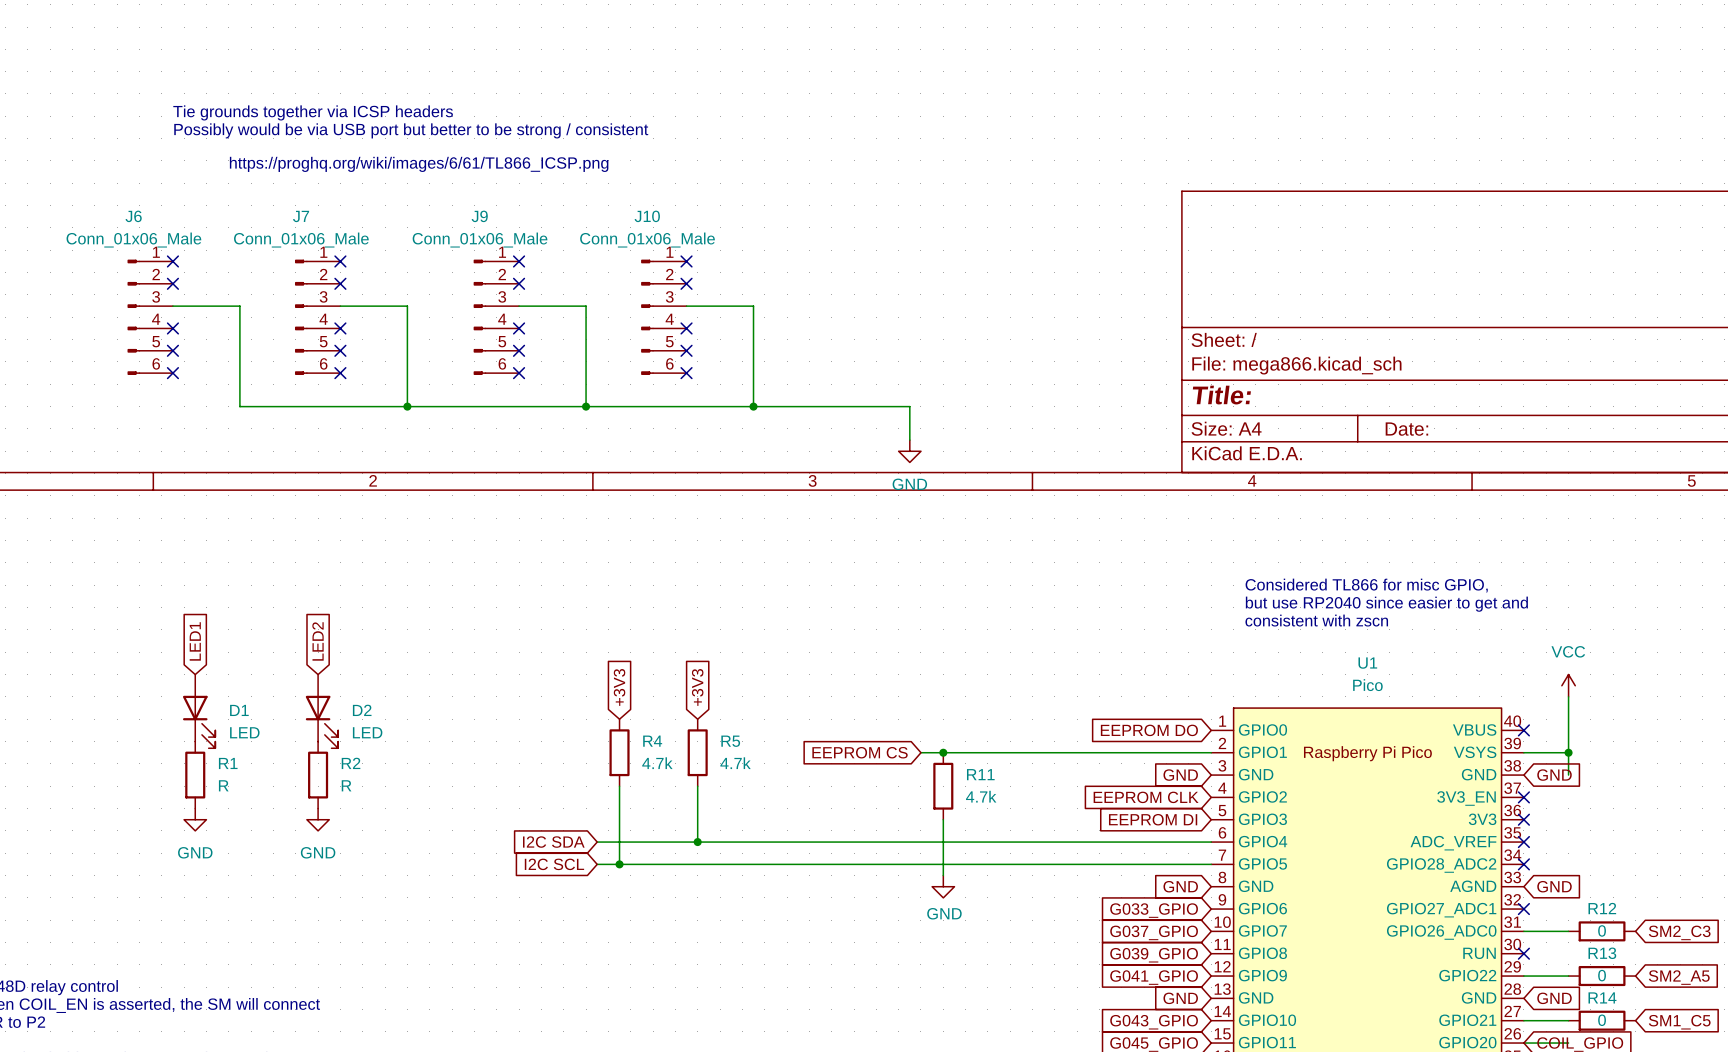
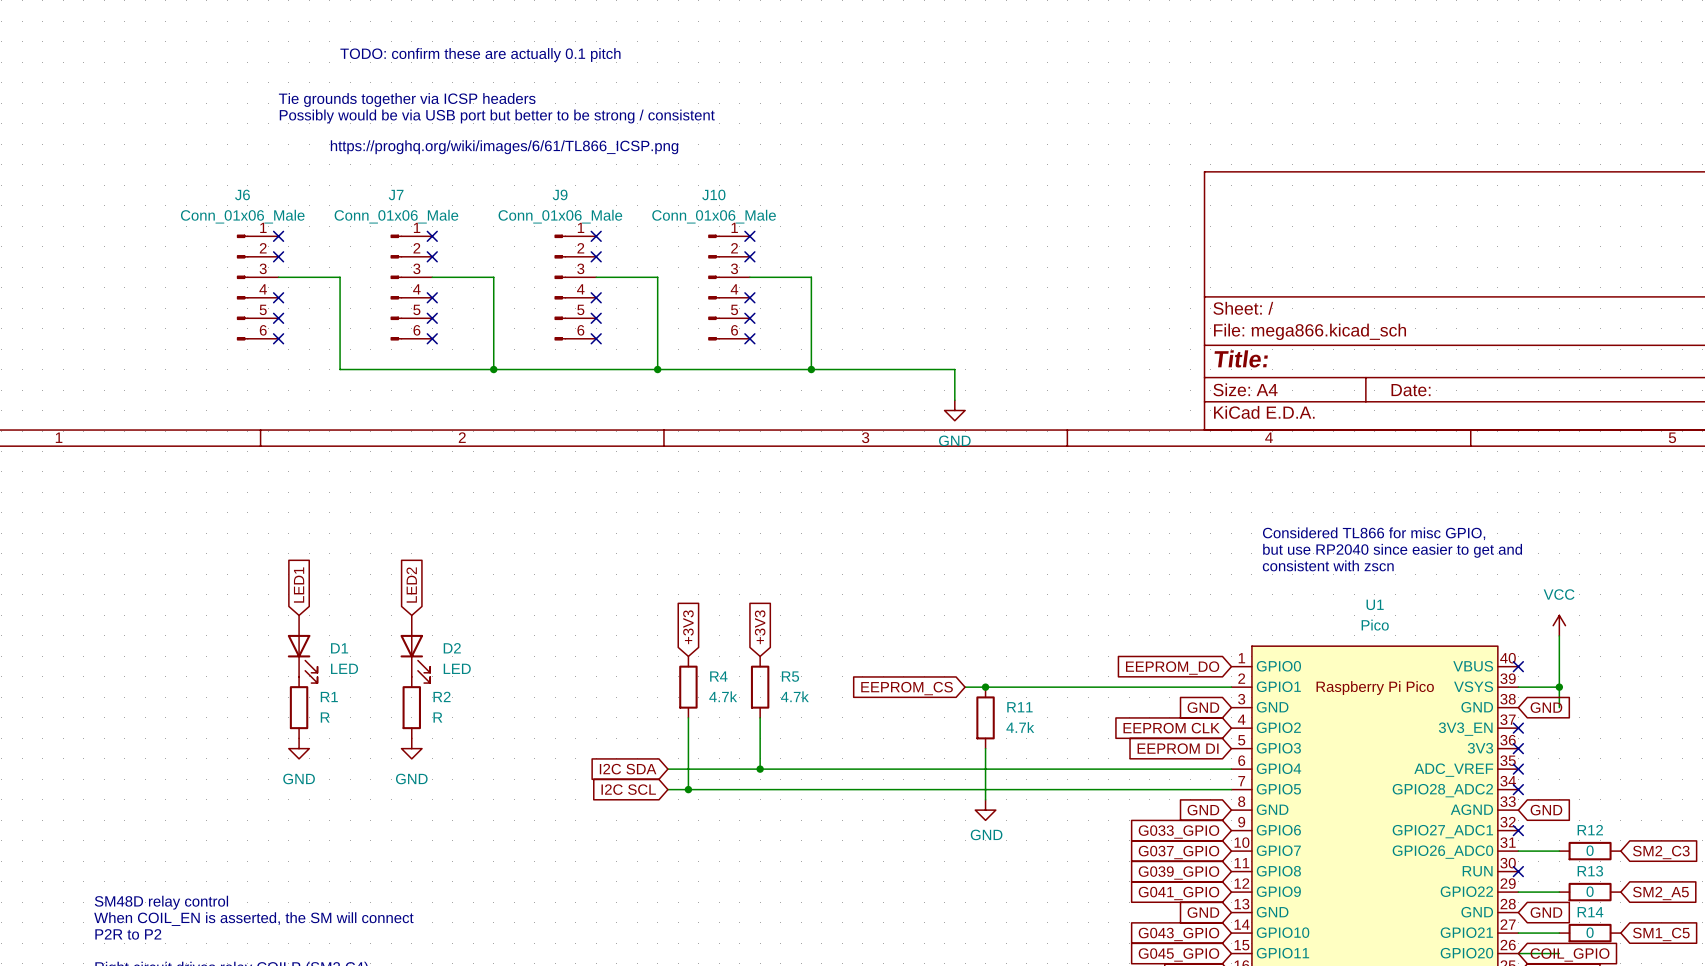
text: none -> TODO: confirm these are actually 0.1 pitch (480, 55)
global label: EEPROM DO (1149, 730) -> EEPROM_DO (1172, 668)
global label: EEPROM CS (860, 752) -> EEPROM_CS (907, 688)

